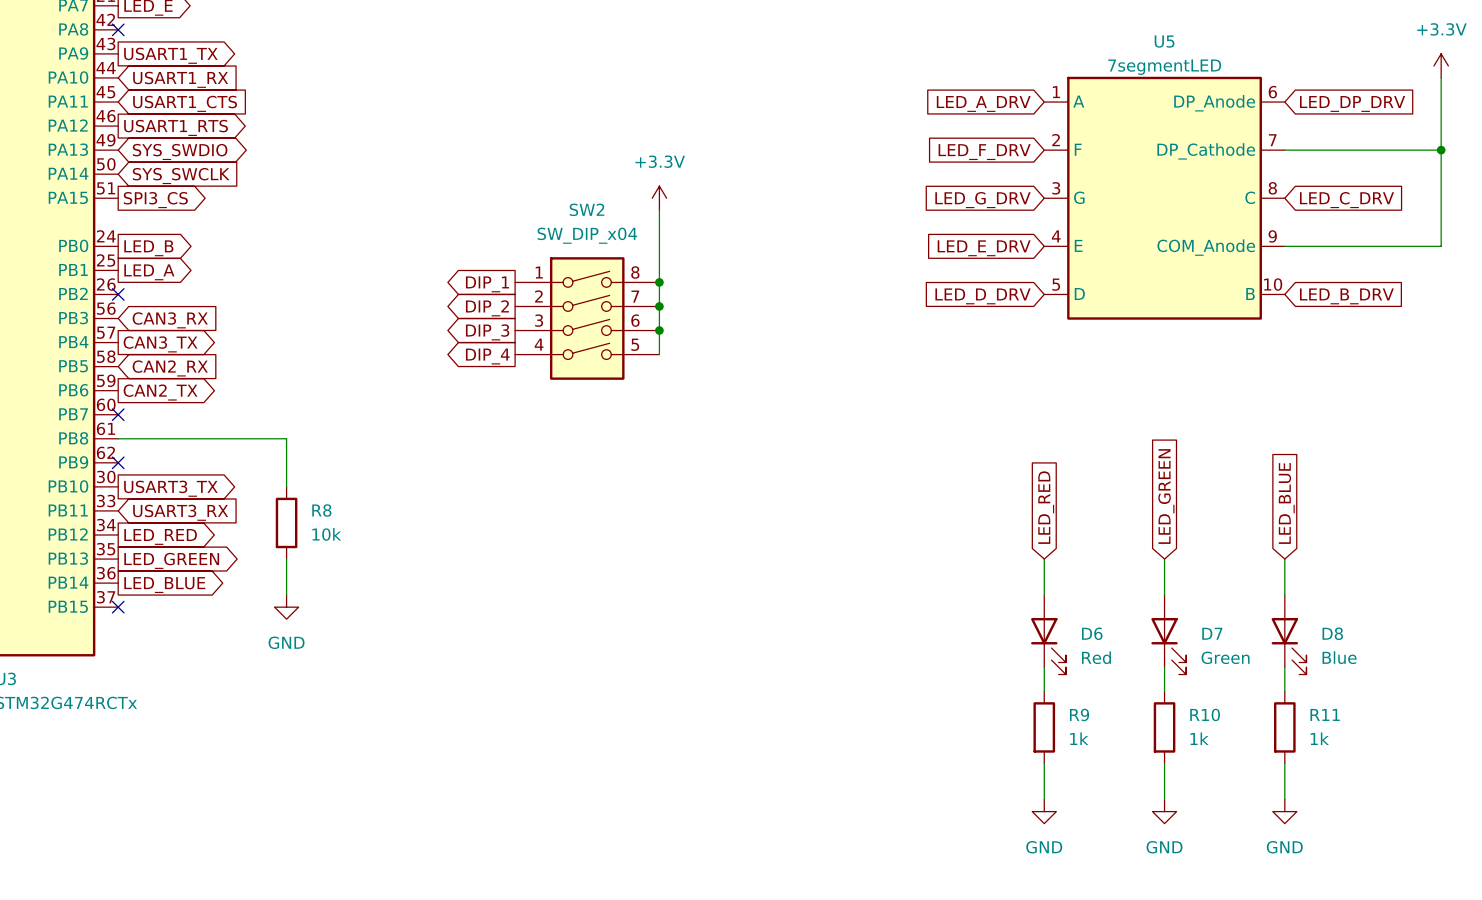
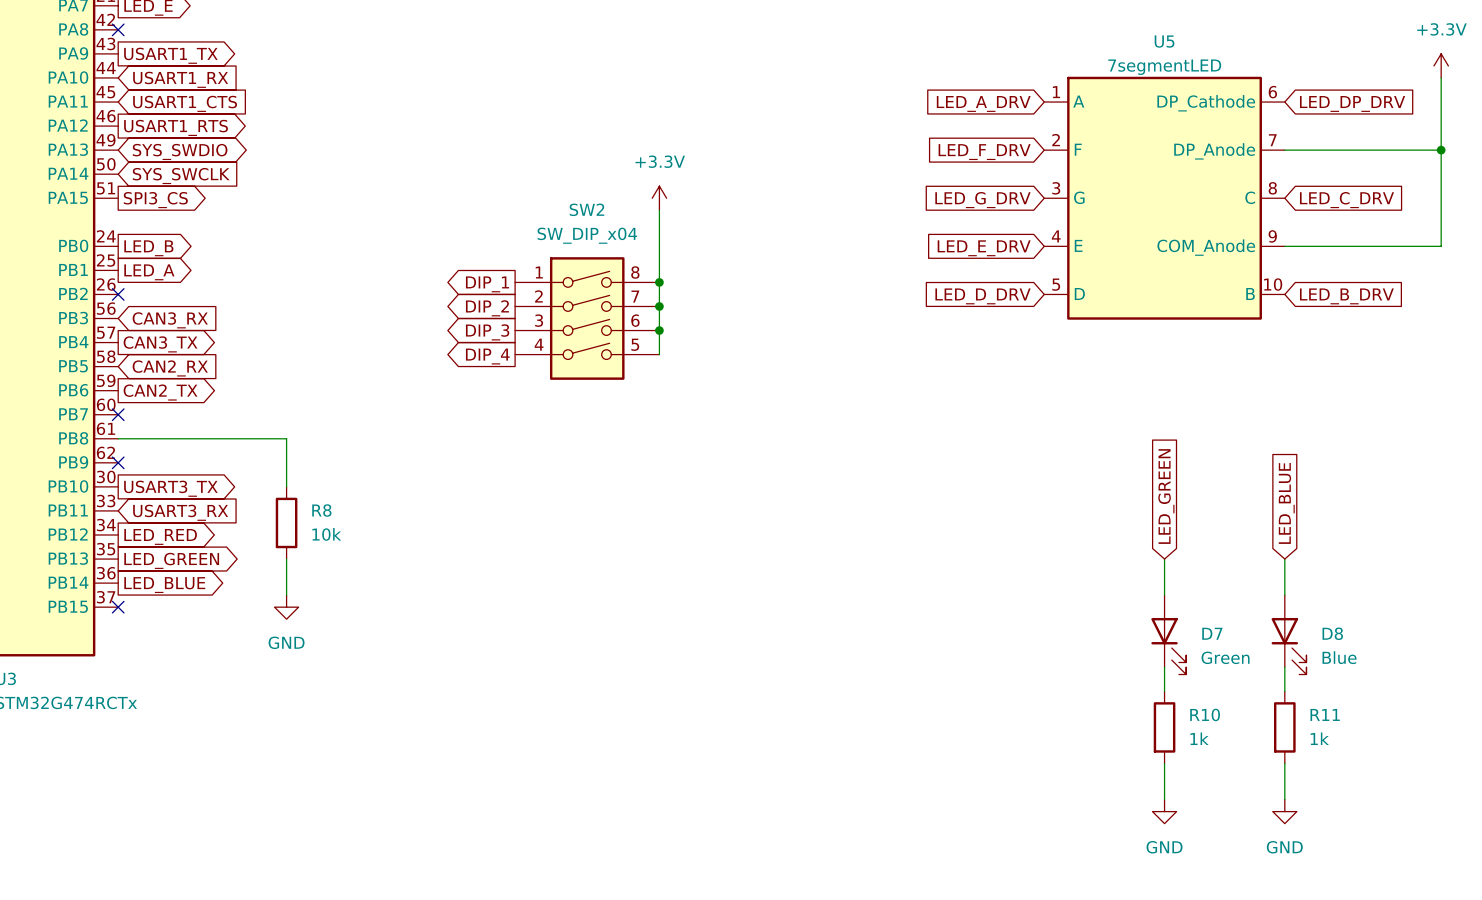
U5 pin name: DP_Anode (1214, 103) -> DP_Cathode (1206, 103)
U5 pin name: DP_Cathode (1206, 151) -> DP_Anode (1214, 151)
global label: LED_RED (1046, 507) -> none
wire: (1044, 559) (1044, 595) -> none
D6: Red (1048, 634) -> none
wire: (1044, 667) (1044, 691) -> none
R9: 1k (1044, 727) -> none
wire: (1044, 763) (1044, 799) -> none
power symbol: GND (1044, 811) -> none

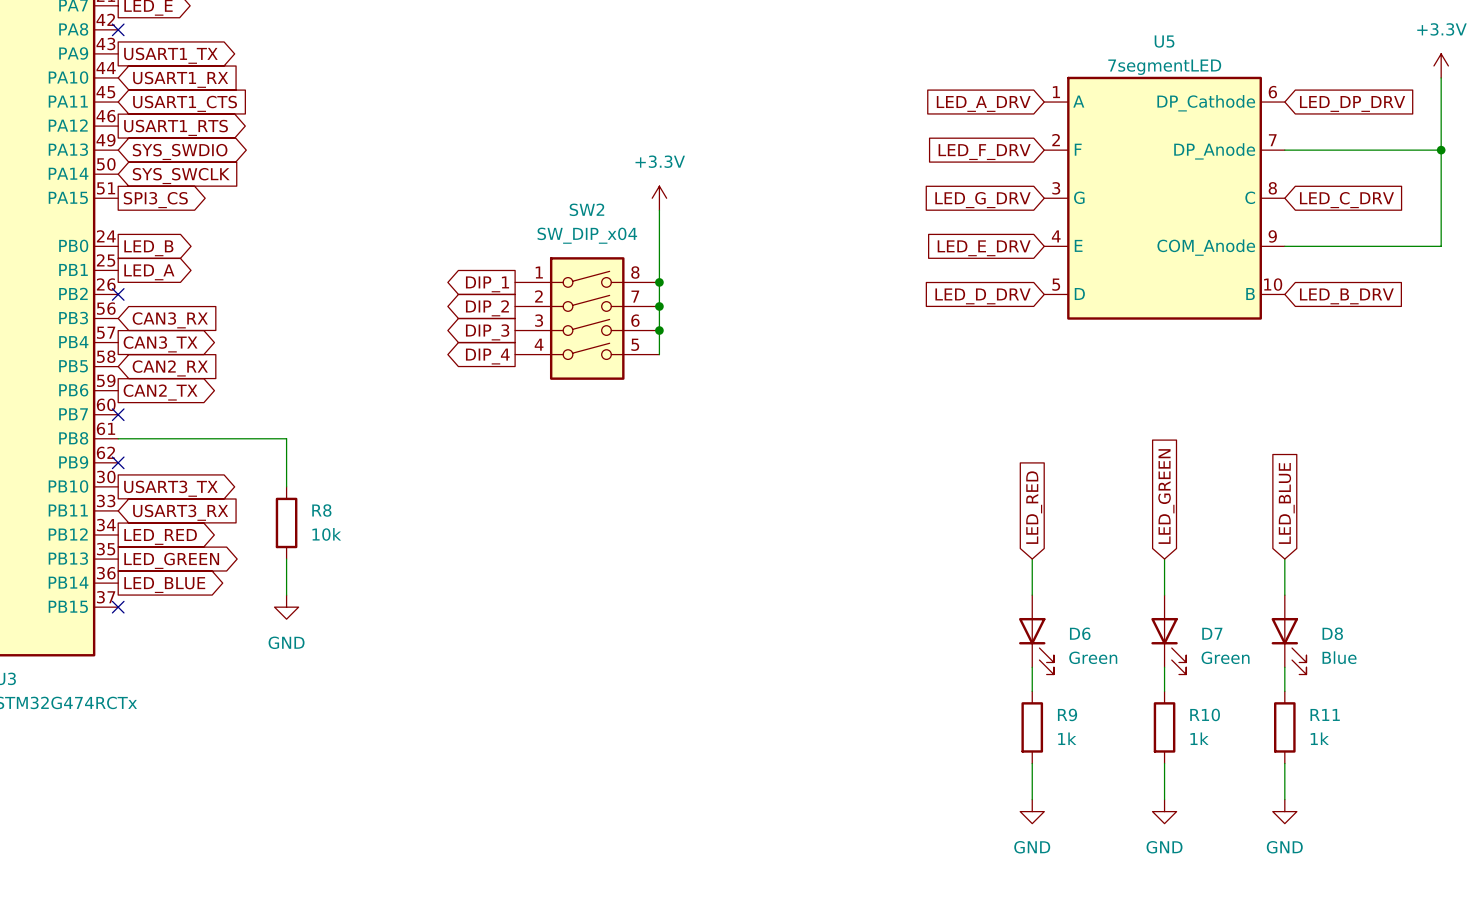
global label: none -> LED_RED (1034, 507)
wire: none -> (1032, 559) (1032, 595)
D6: none -> Green (1036, 634)
wire: none -> (1032, 667) (1032, 691)
R9: none -> 1k (1032, 727)
wire: none -> (1032, 763) (1032, 799)
power symbol: none -> GND (1032, 811)

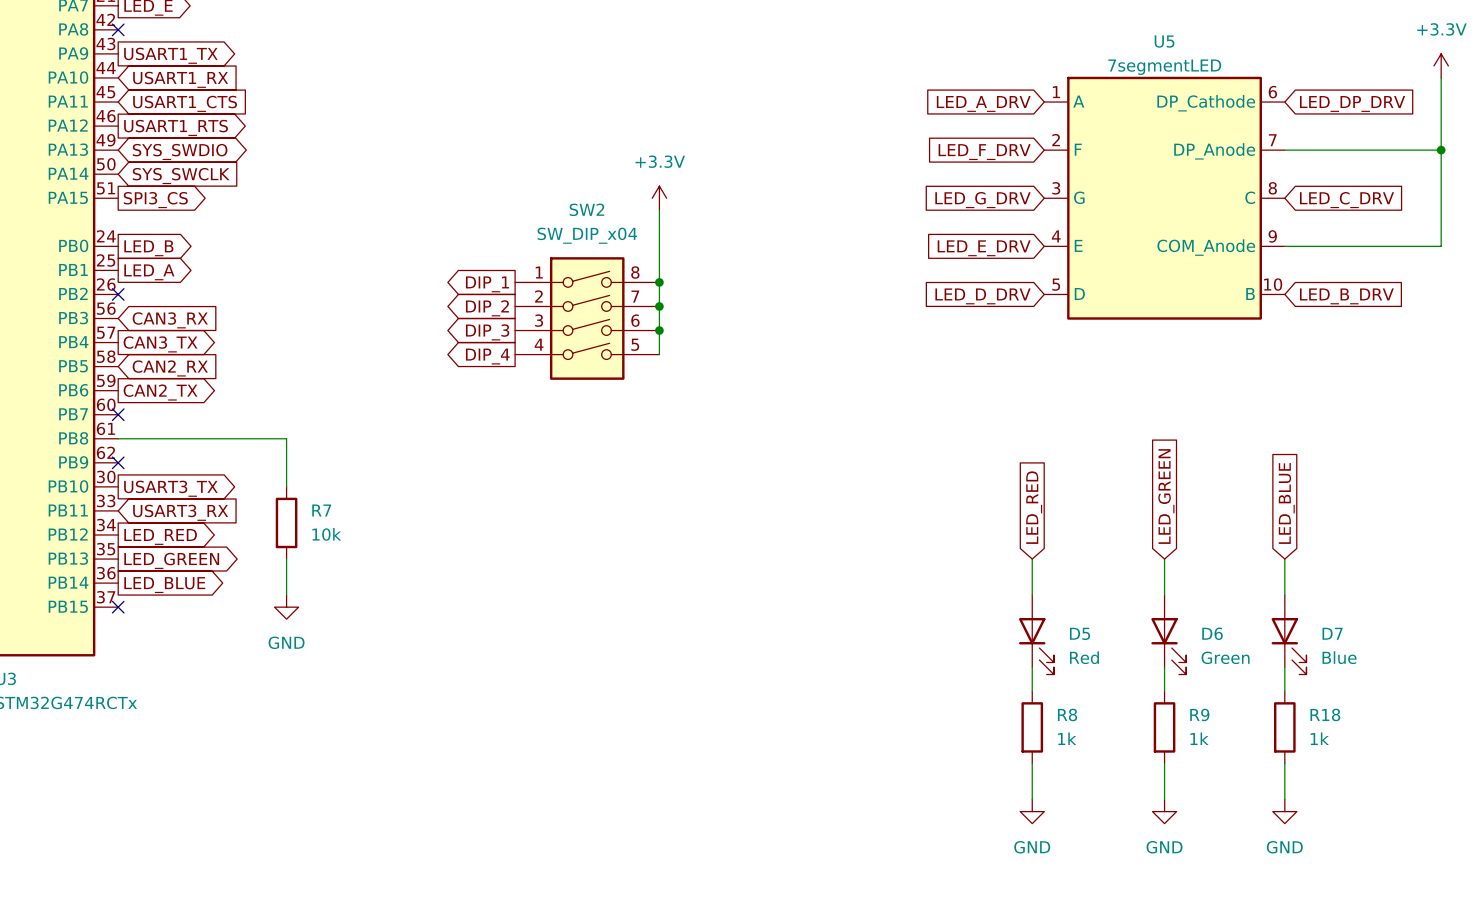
R8 name: R8 (321, 510) -> R7 (321, 510)
D6 name: D6 (1080, 633) -> D5 (1080, 633)
D7 name: D7 (1212, 633) -> D6 (1212, 633)
D8 name: D8 (1332, 633) -> D7 (1332, 633)
D6 value: Green (1093, 657) -> Red (1084, 657)
R9 name: R9 (1067, 714) -> R8 (1067, 714)
R10 name: R10 (1205, 714) -> R9 (1199, 714)
R11 name: R11 (1325, 714) -> R18 (1325, 714)

